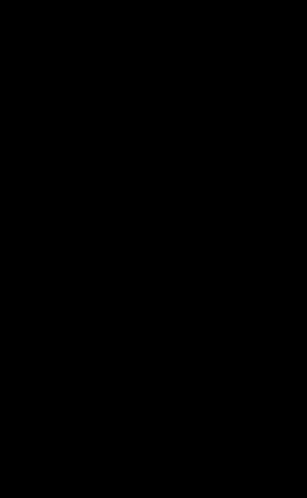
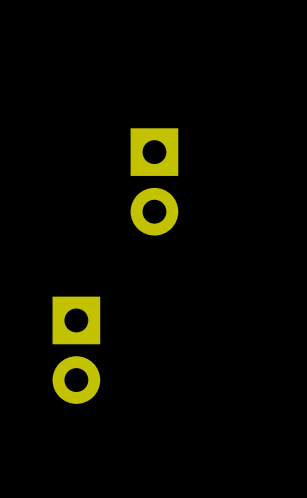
part: none -> (154, 181)
part: none -> (76, 350)

